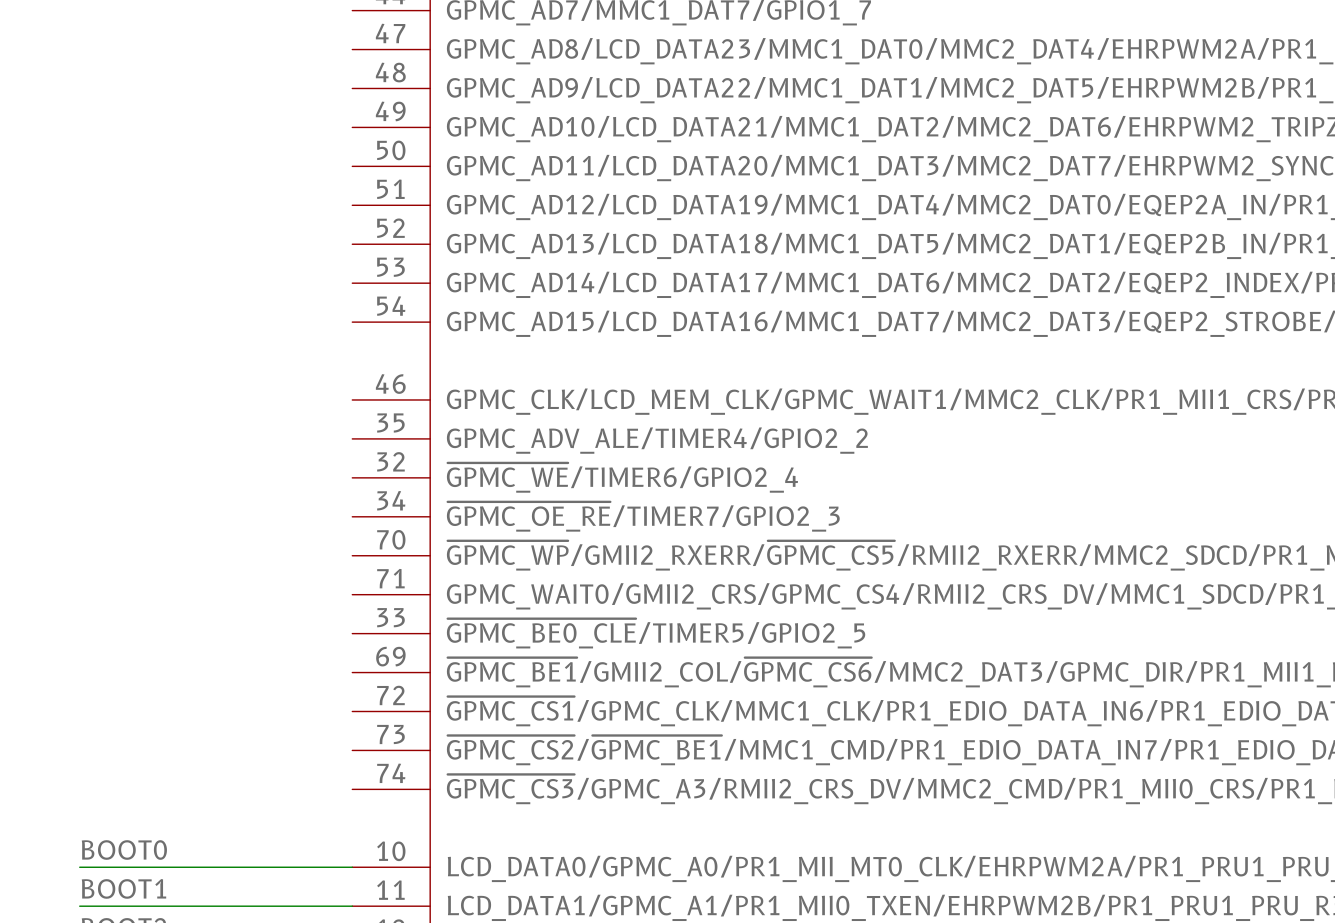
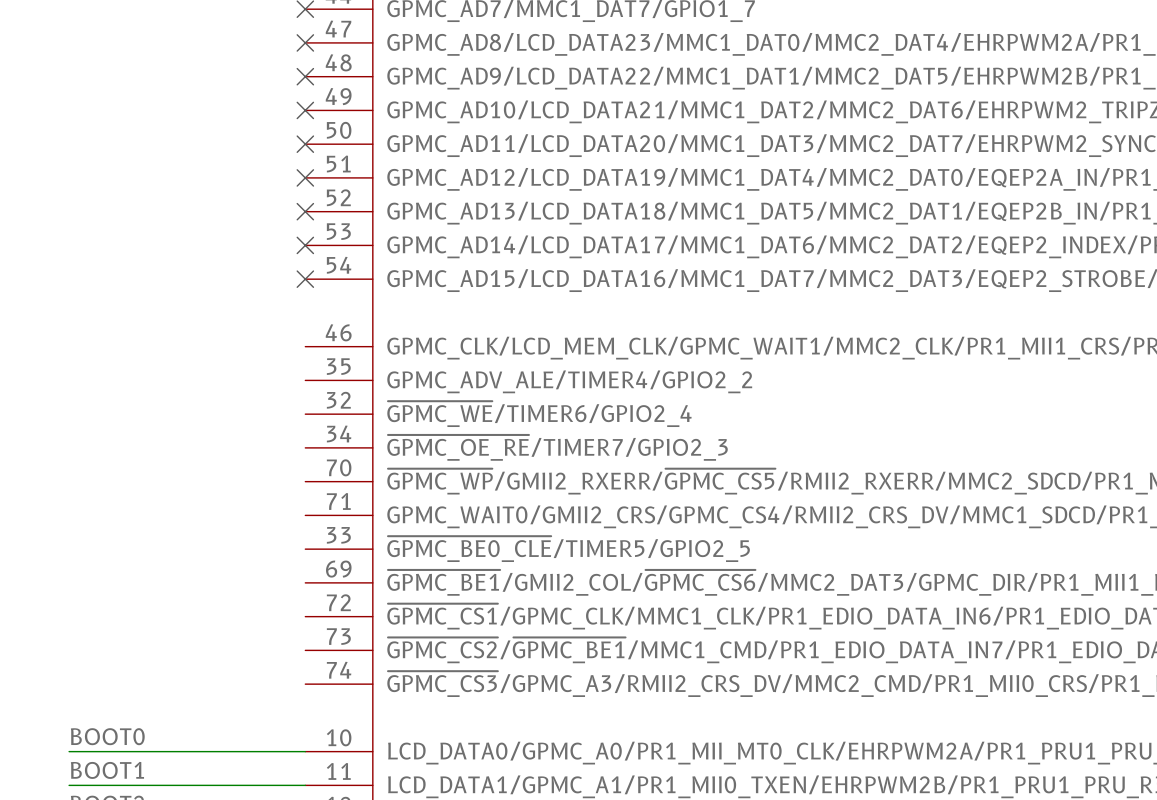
no-connect mark: none -> (305, 9)
no-connect mark: none -> (305, 42)
no-connect mark: none -> (305, 76)
no-connect mark: none -> (305, 110)
no-connect mark: none -> (305, 144)
no-connect mark: none -> (305, 177)
no-connect mark: none -> (305, 211)
no-connect mark: none -> (305, 245)
no-connect mark: none -> (305, 279)

